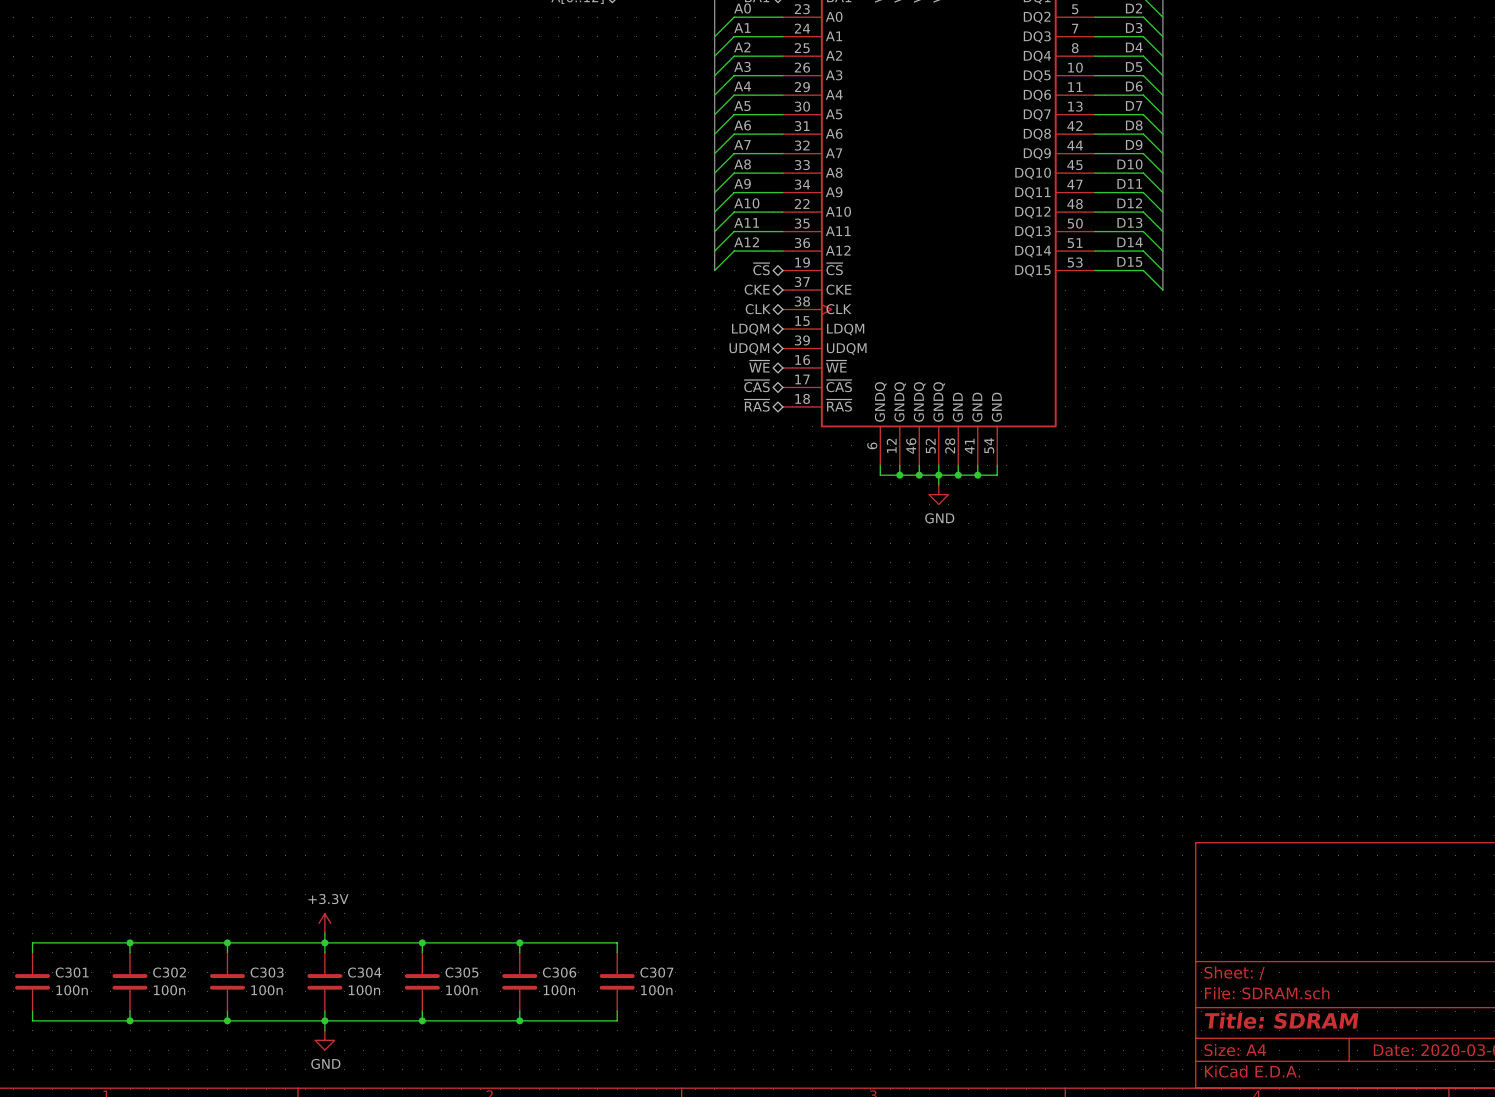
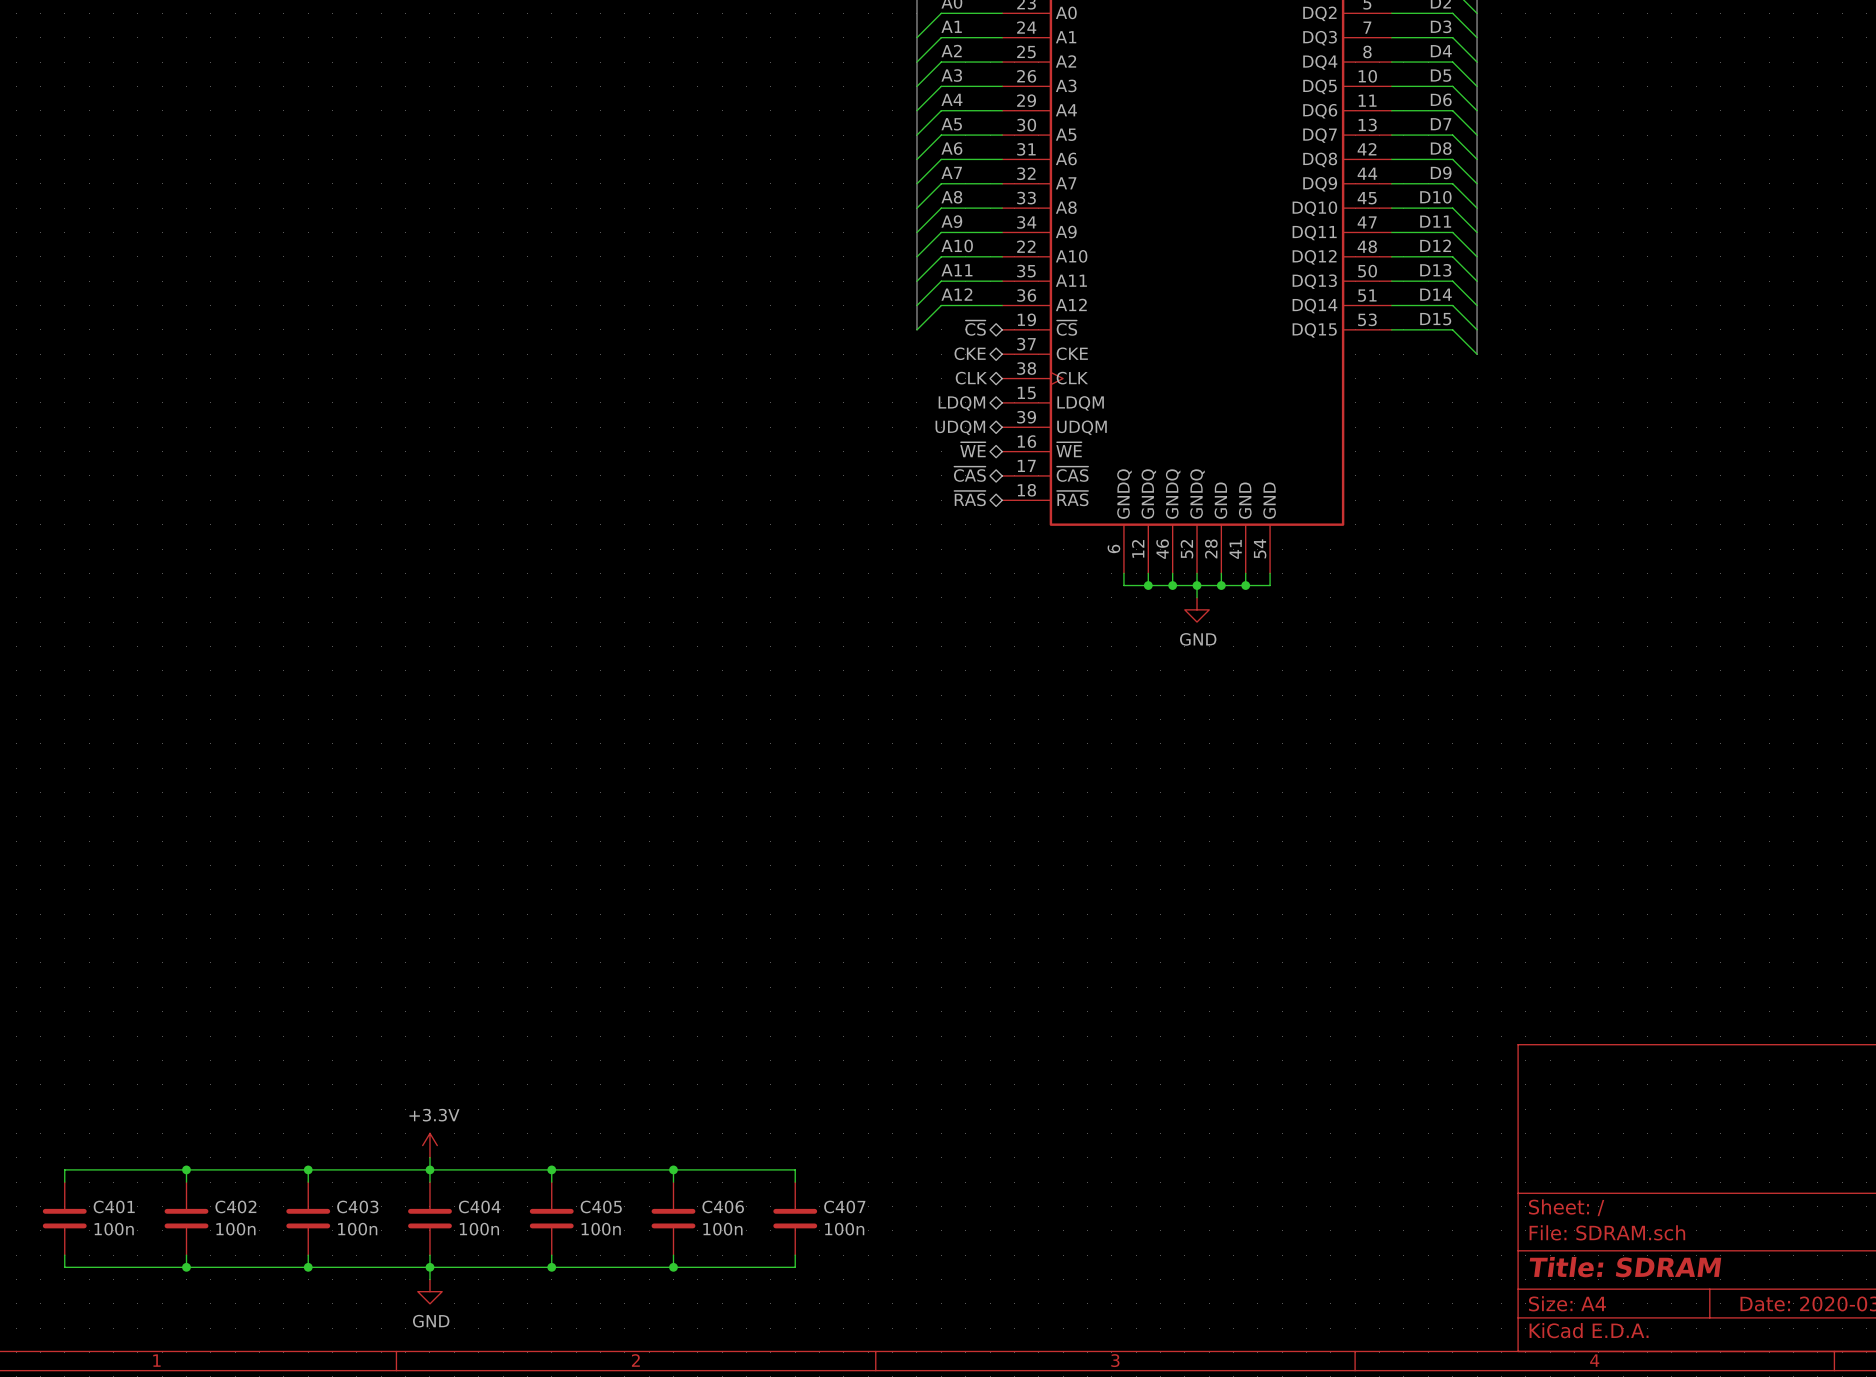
C301 name: C301 (72, 972) -> C401 (114, 1206)
C302 name: C302 (169, 972) -> C402 (235, 1206)
C303 name: C303 (267, 972) -> C403 (357, 1206)
C304 name: C304 (364, 972) -> C404 (479, 1206)
C305 name: C305 (461, 972) -> C405 (601, 1206)
C306 name: C306 (559, 972) -> C406 (723, 1206)
C307 name: C307 (656, 972) -> C407 (844, 1206)

